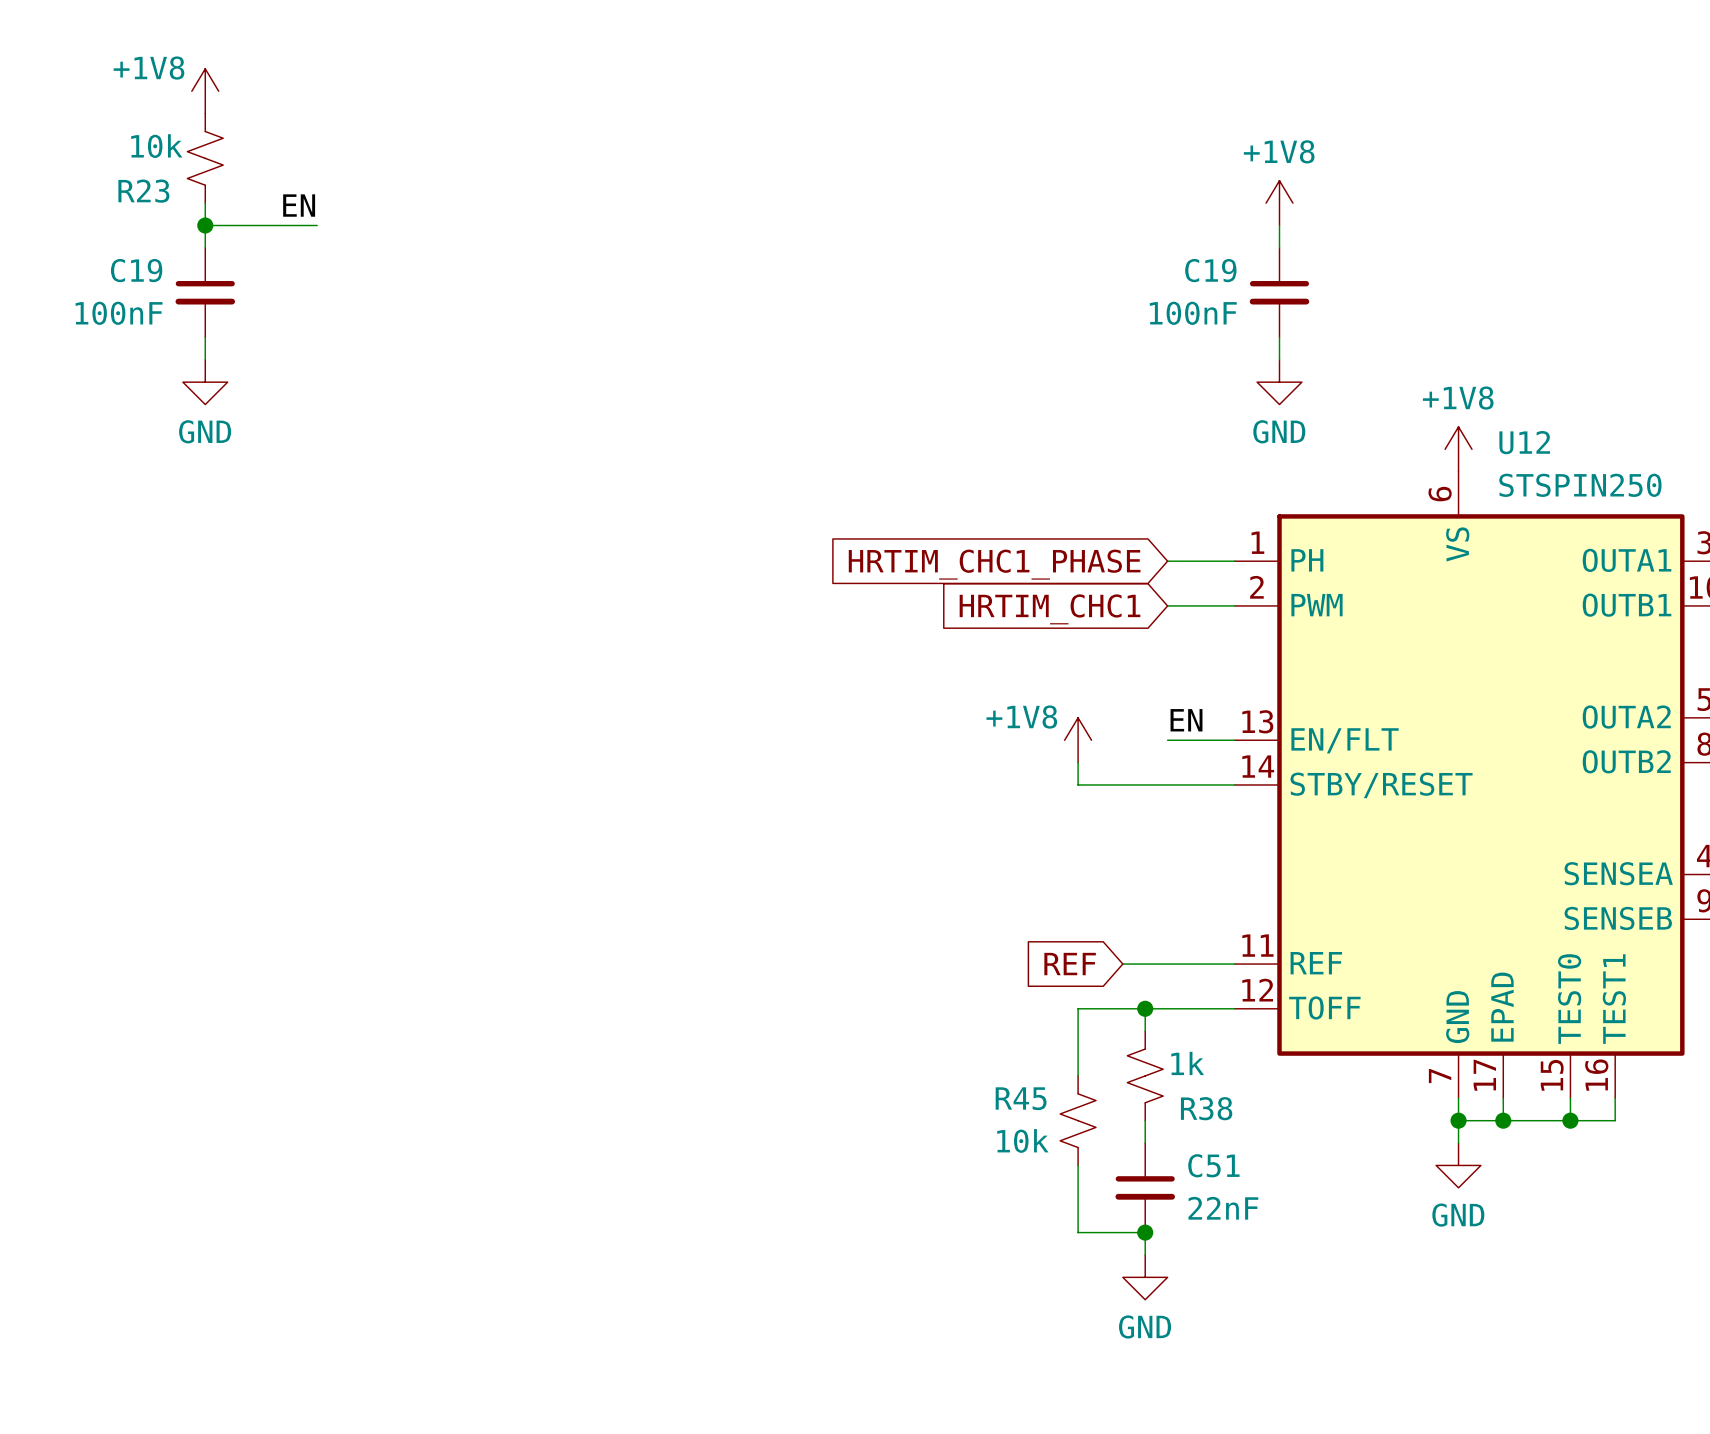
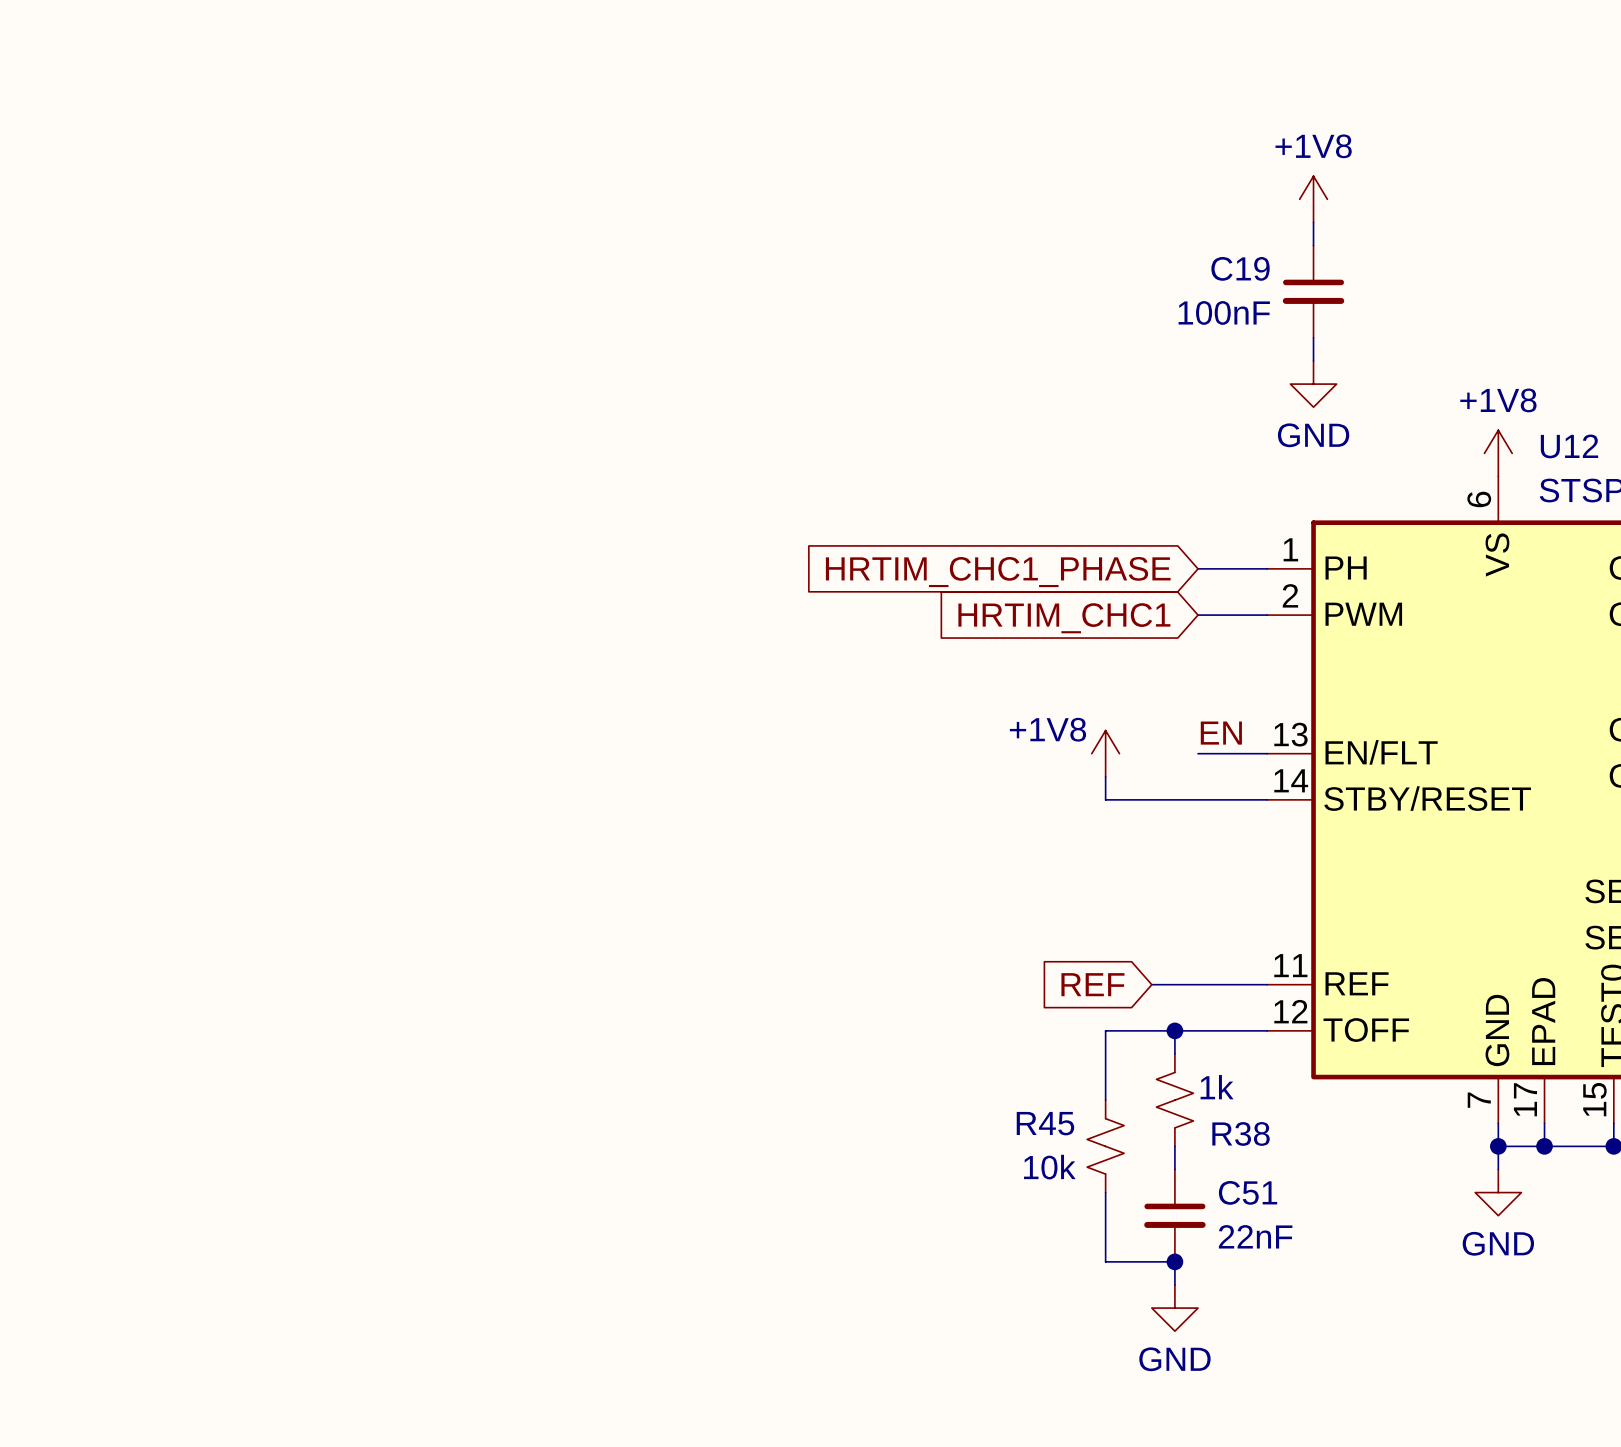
power symbol: +1V8 (205, 91) -> none
R23: 10k (205, 158) -> none
wire: (205, 203) (205, 247) -> none
label: EN (299, 205) -> none
wire: (205, 225) (317, 225) -> none
junction: (205, 225) -> none
C19: 100nF (205, 292) -> none
wire: (205, 337) (205, 359) -> none
power symbol: GND (205, 382) -> none

